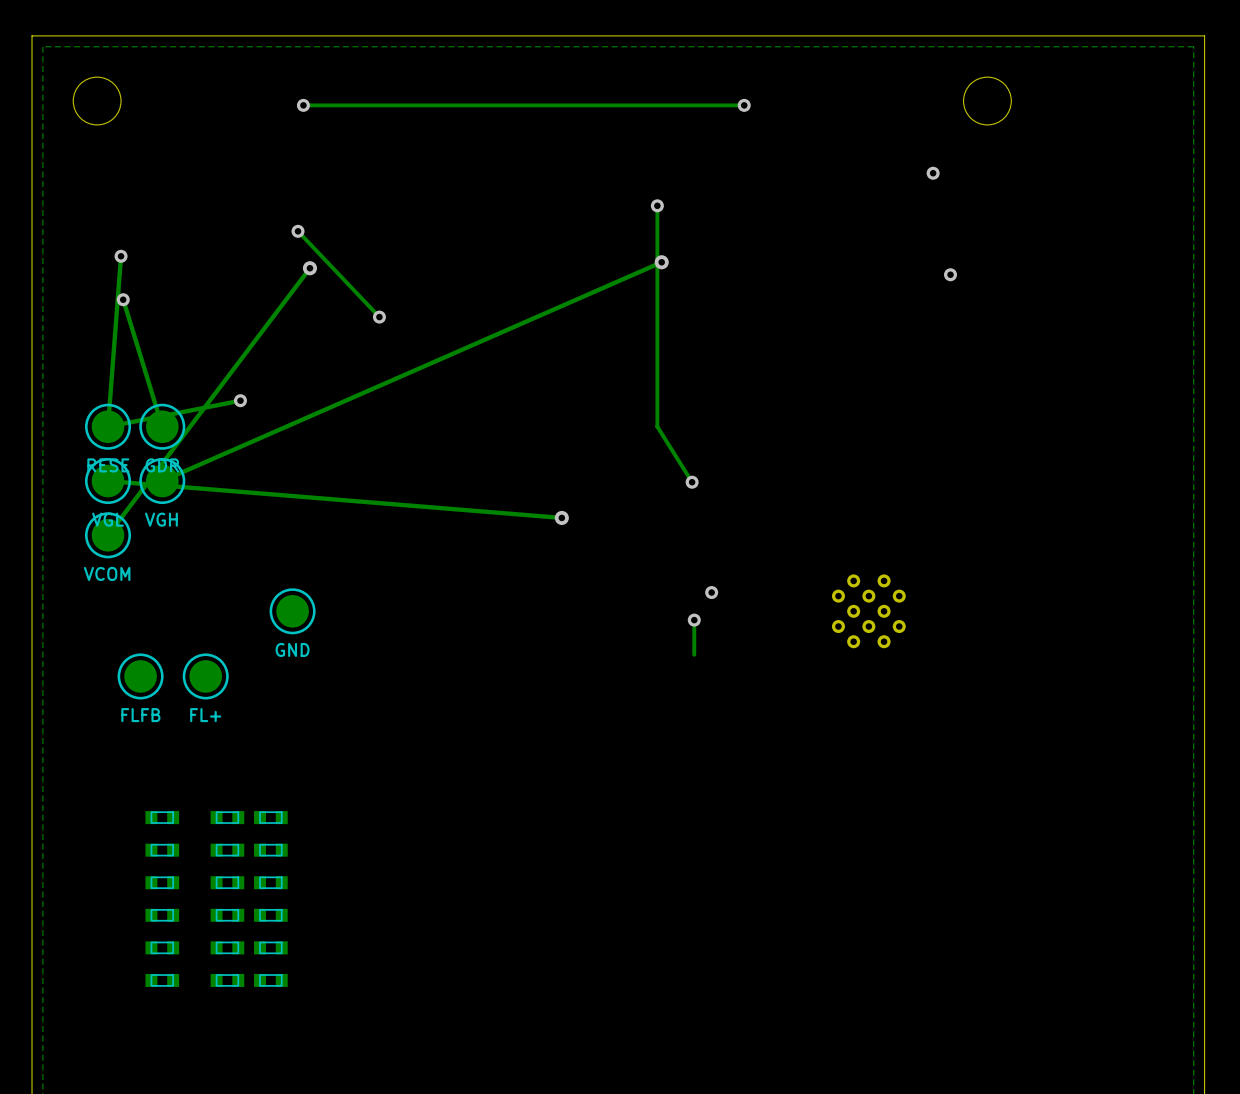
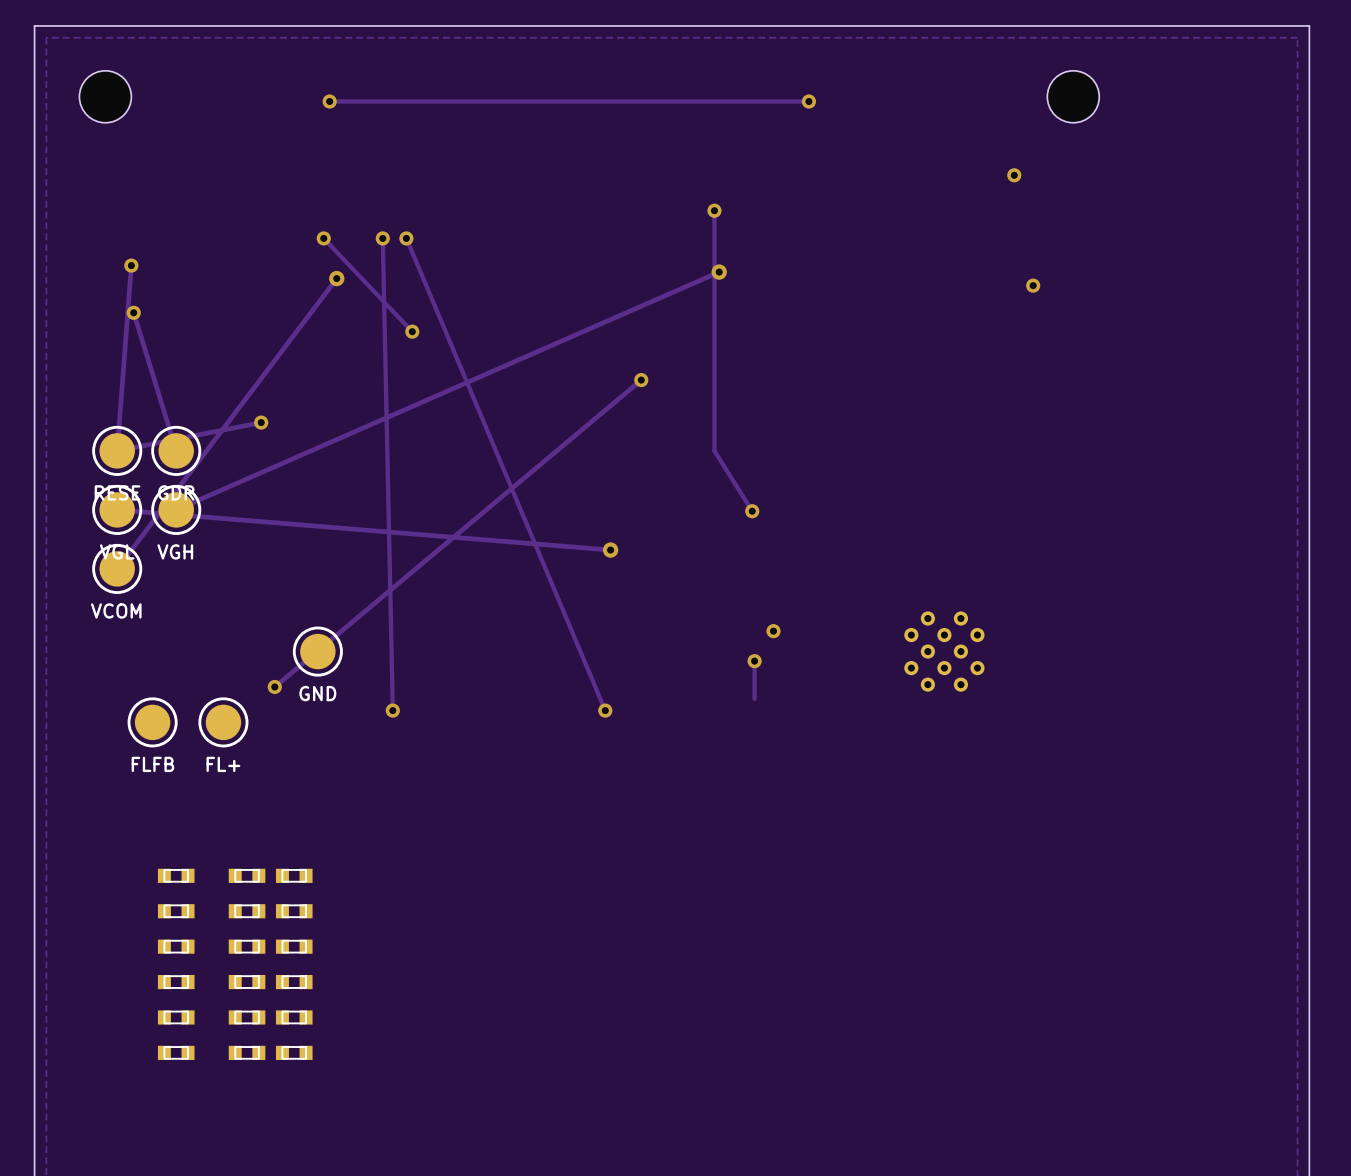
track: none -> (382, 238) (392, 710)
via: none -> (382, 238)
track: none -> (406, 238) (605, 710)
via: none -> (406, 238)
track: none -> (641, 380) (274, 686)
via: none -> (641, 380)
via: none -> (274, 686)
via: none -> (392, 710)
via: none -> (605, 710)

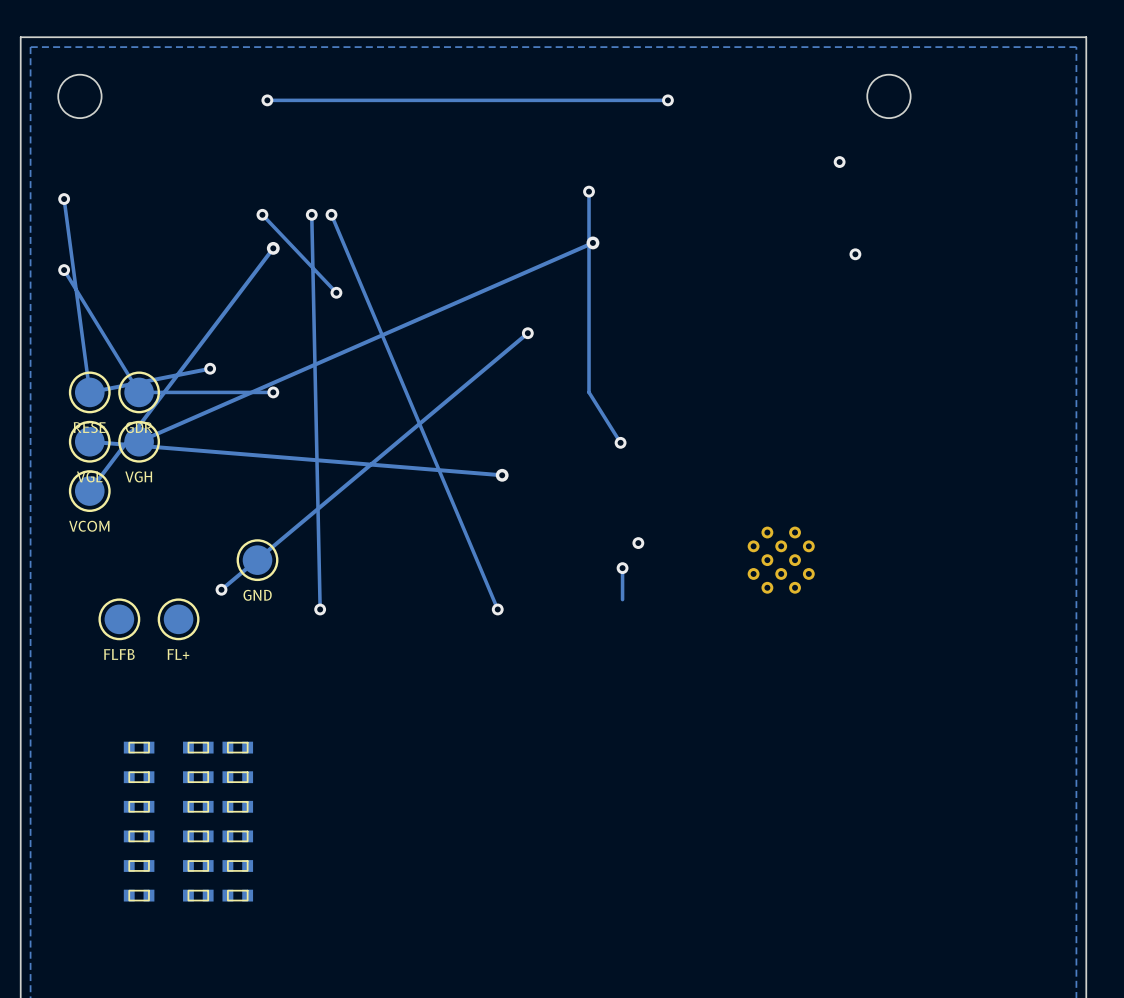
via: none -> (64, 199)
track: (131, 265) (117, 450) -> (64, 199) (89, 392)
via: (131, 265) -> none
track: none -> (64, 270) (139, 392) (273, 392)
via: none -> (64, 270)
track: (133, 312) (176, 450) -> none
via: (133, 312) -> none
via: none -> (273, 392)

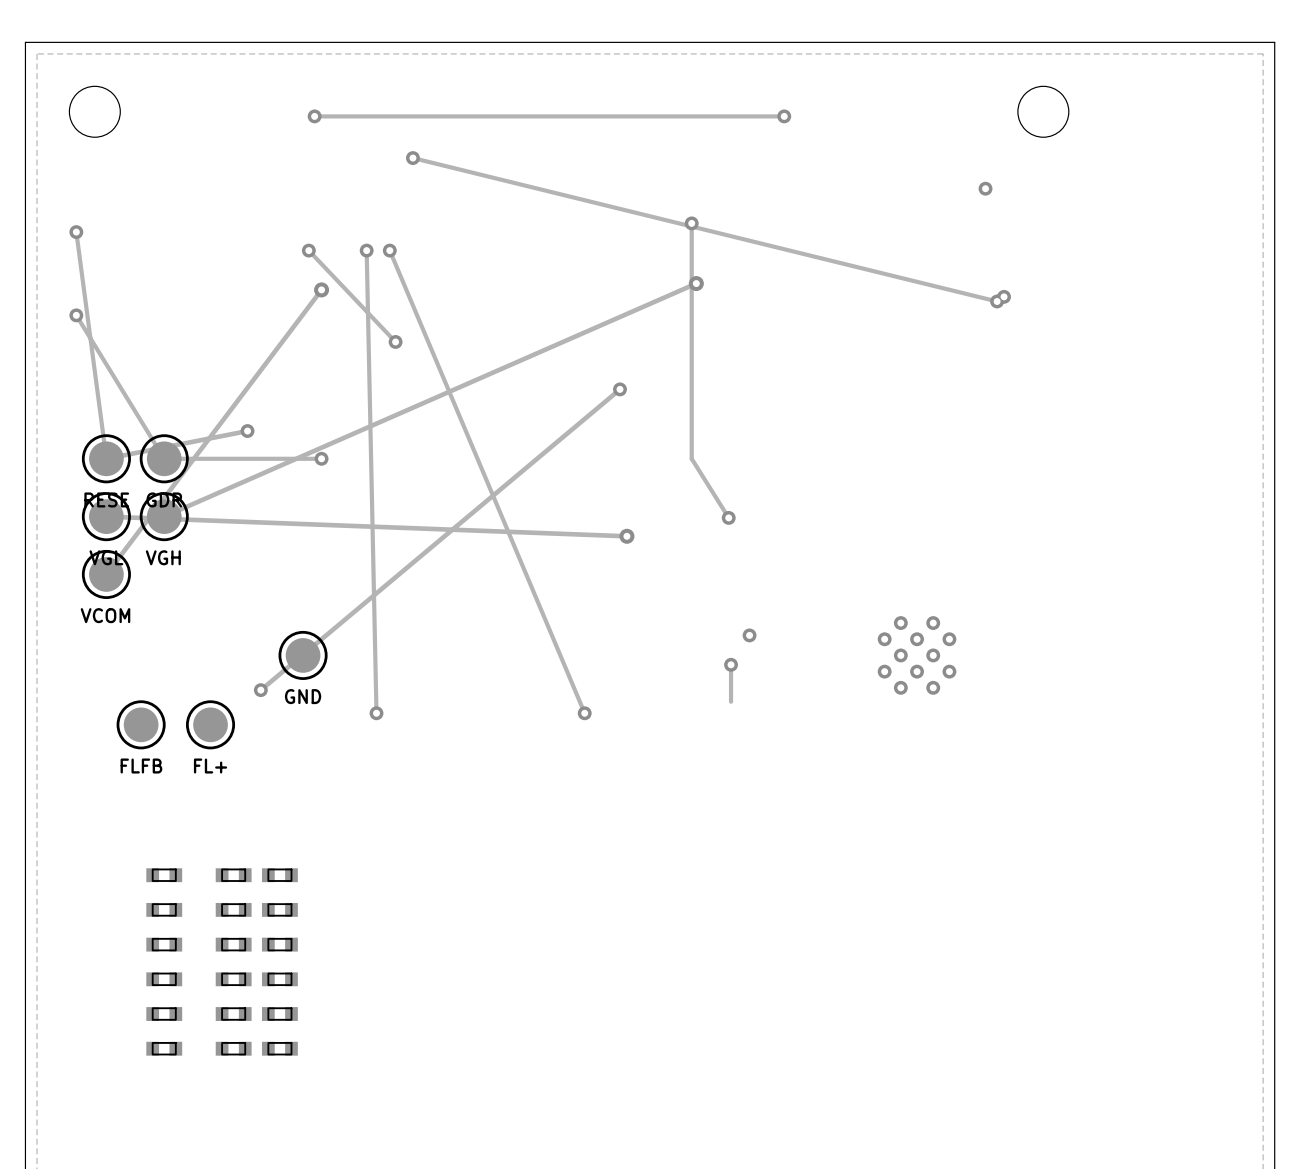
track: none -> (412, 158) (997, 301)
via: none -> (412, 158)
via: none -> (997, 301)
track: (89, 441) (502, 475) -> (106, 516) (626, 536)
via: none -> (626, 536)
via: (502, 475) -> none

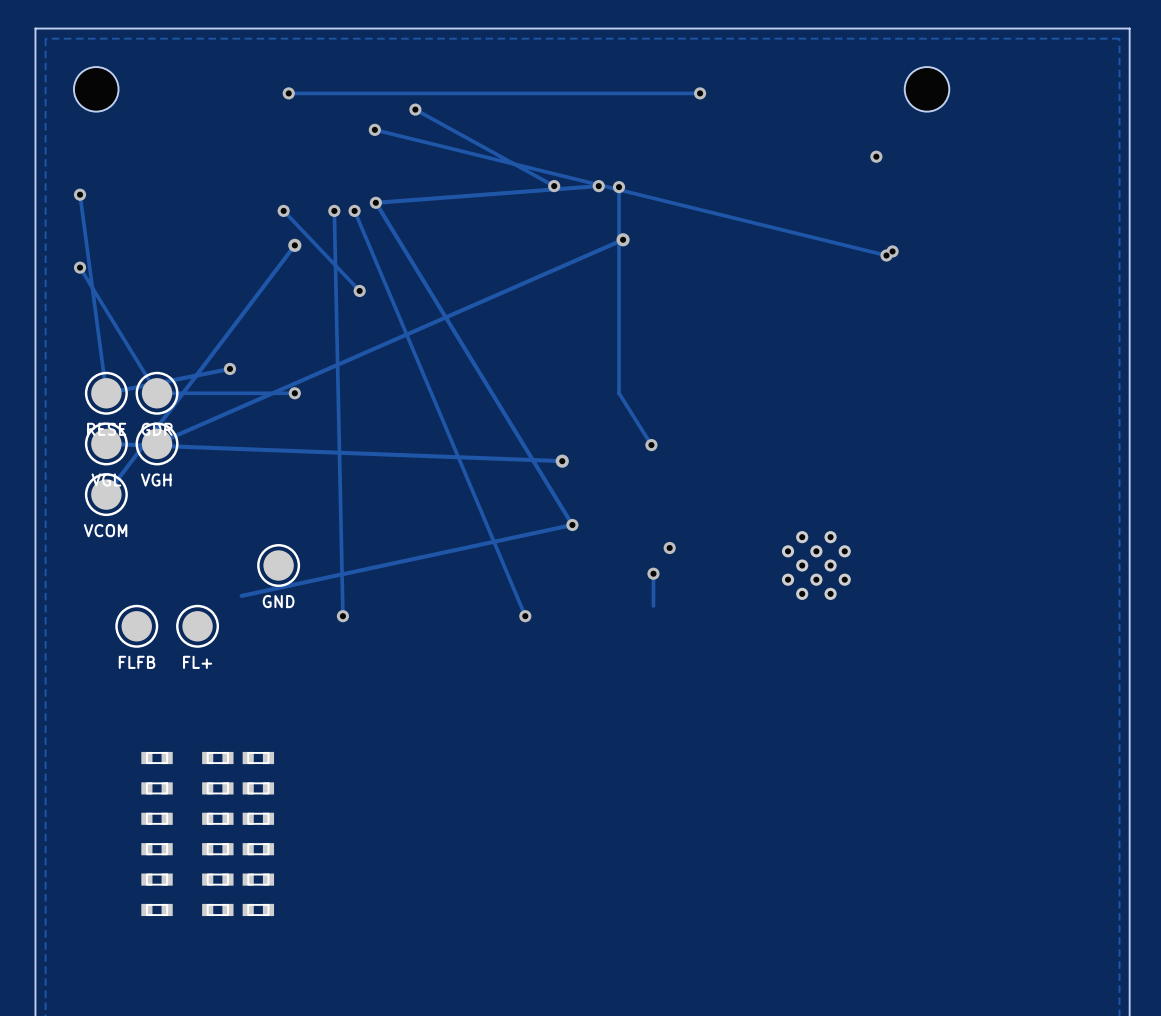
track: none -> (415, 109) (554, 186)
via: none -> (415, 109)
via: none -> (554, 186)
via: none -> (598, 186)
via: none -> (375, 202)
track: (620, 389) (260, 690) -> (598, 186) (375, 202) (572, 524) (241, 595)
via: (620, 389) -> none
via: none -> (572, 524)
via: (260, 690) -> none

